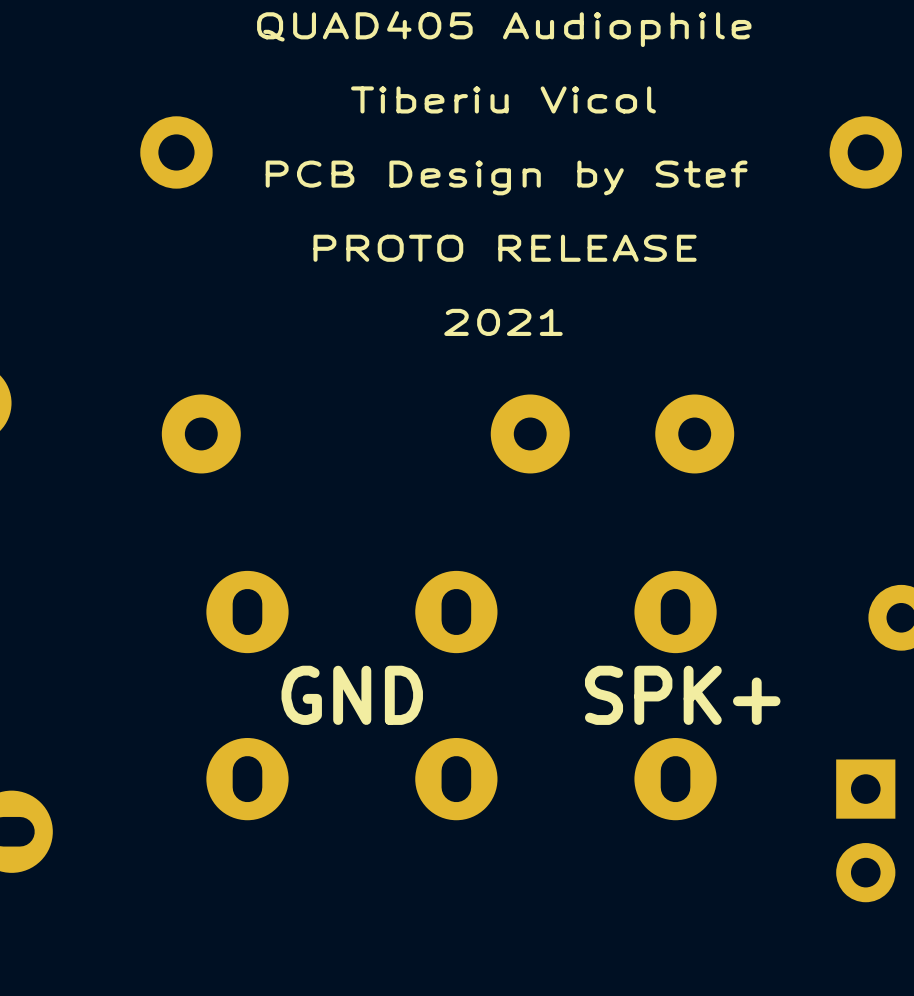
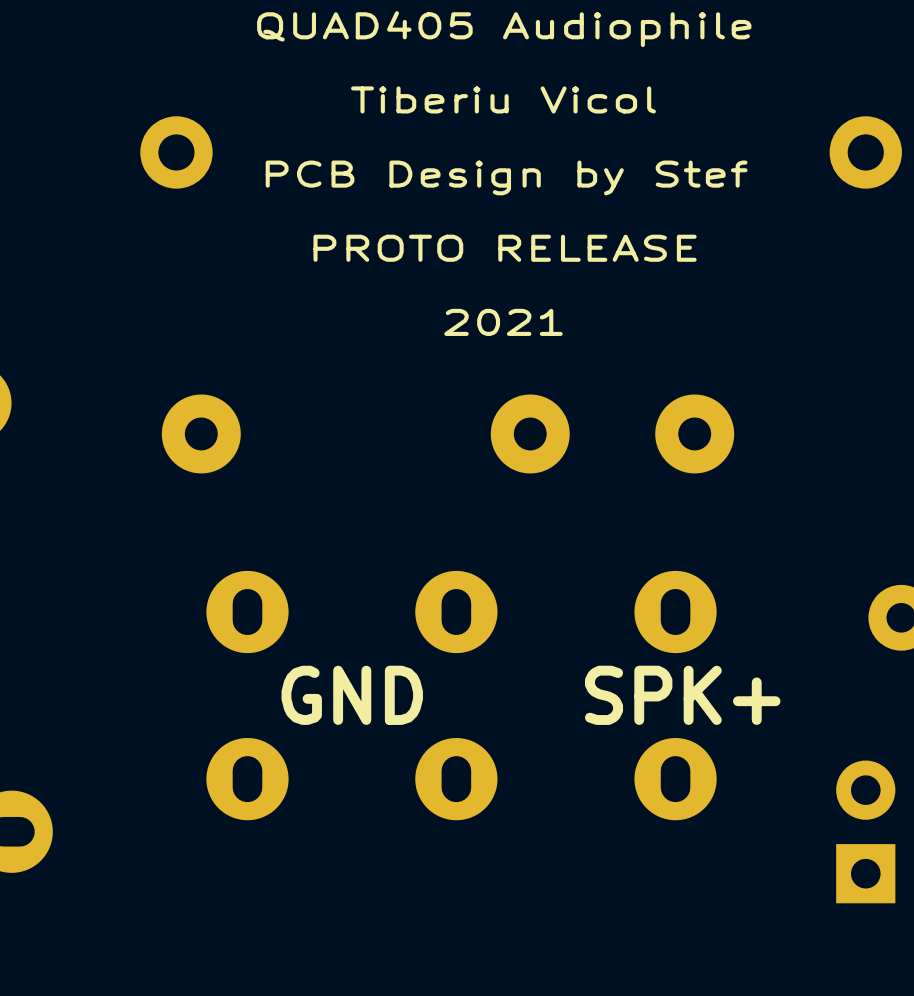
part rotation: 0° (865, 830) -> 180° (865, 831)

